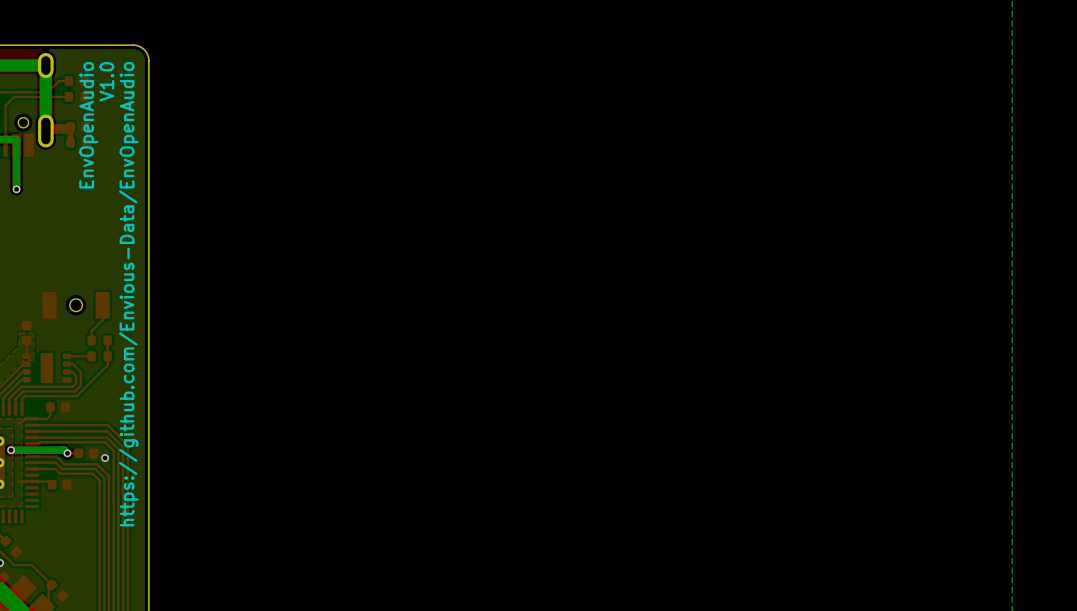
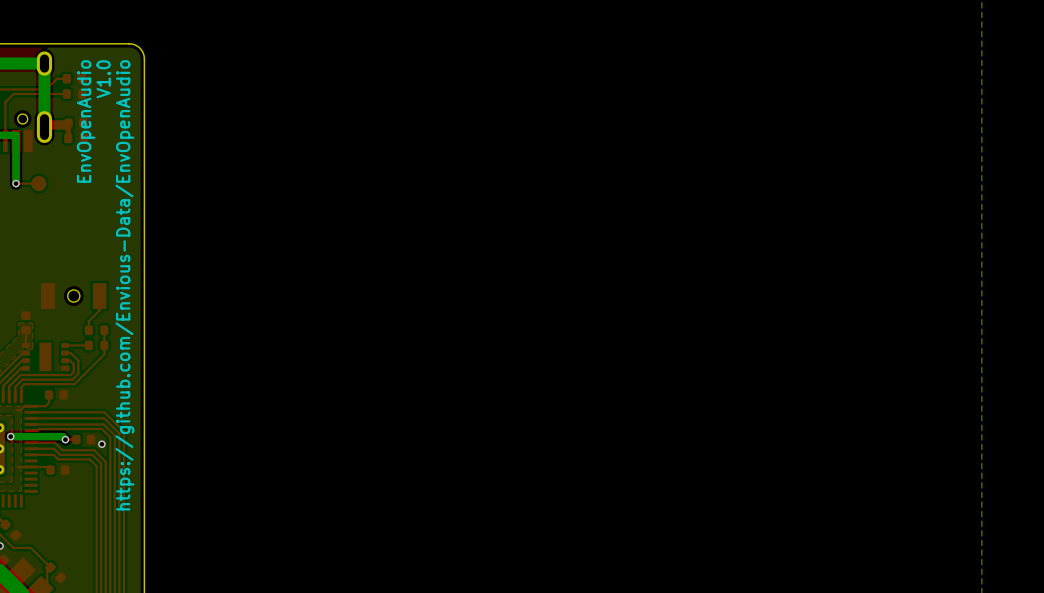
top track: none -> (38, 183) (16, 183)
part: none -> (38, 183)

